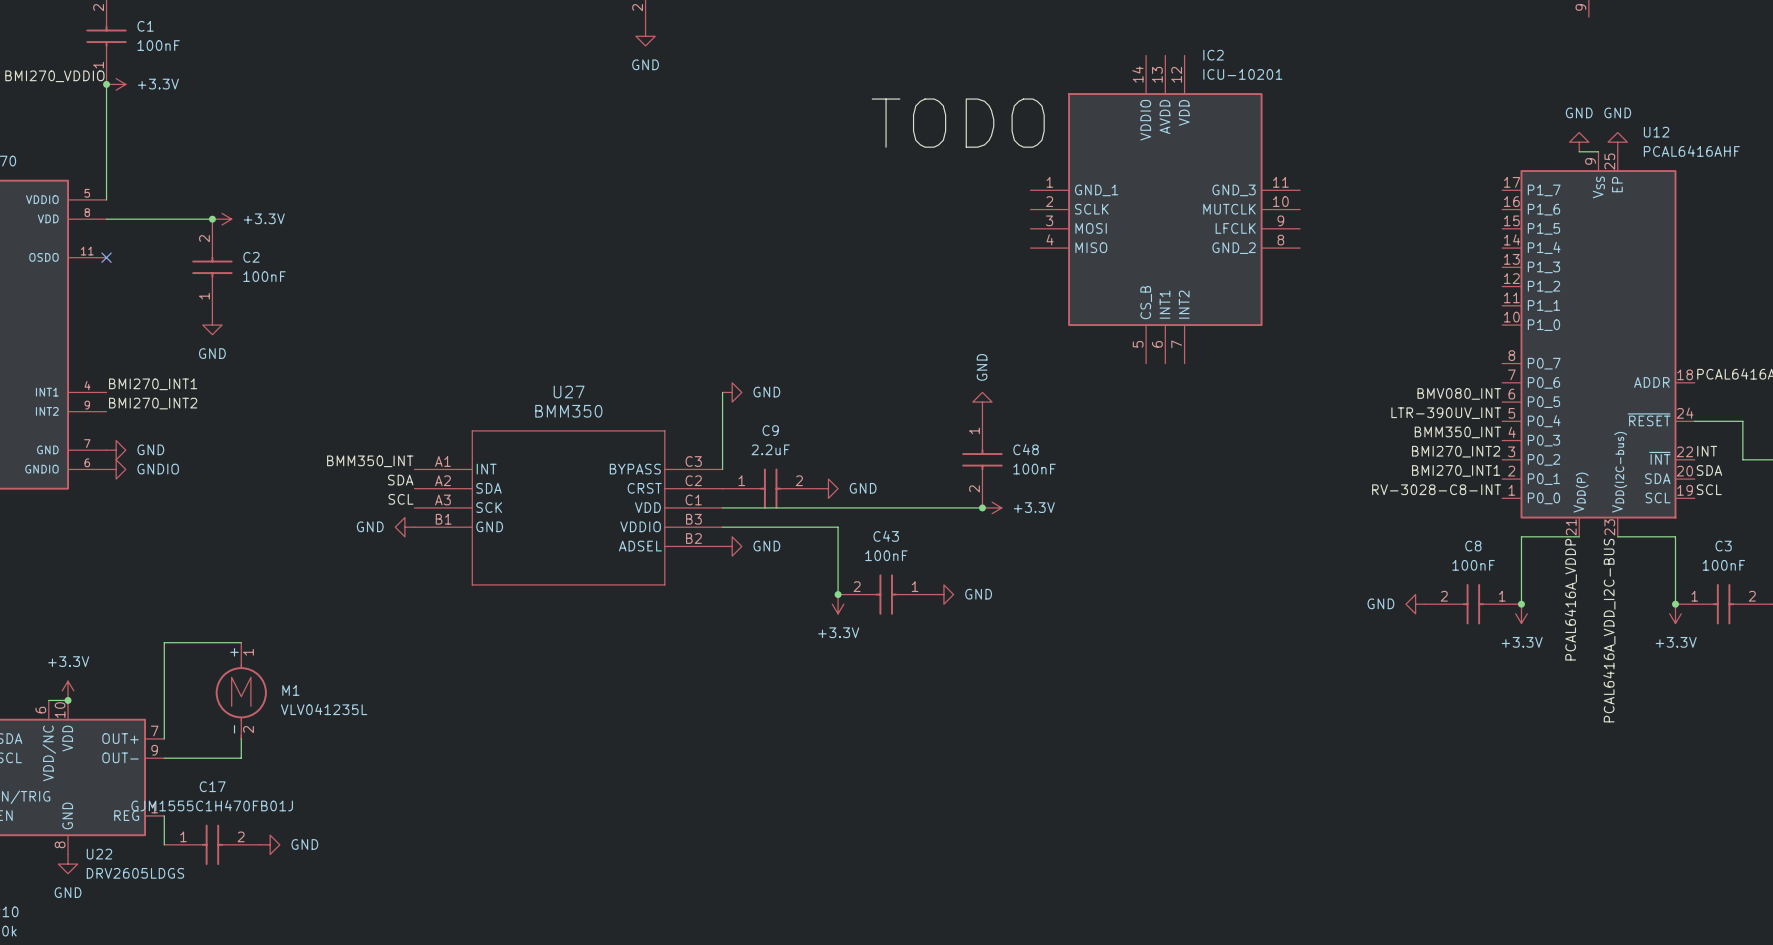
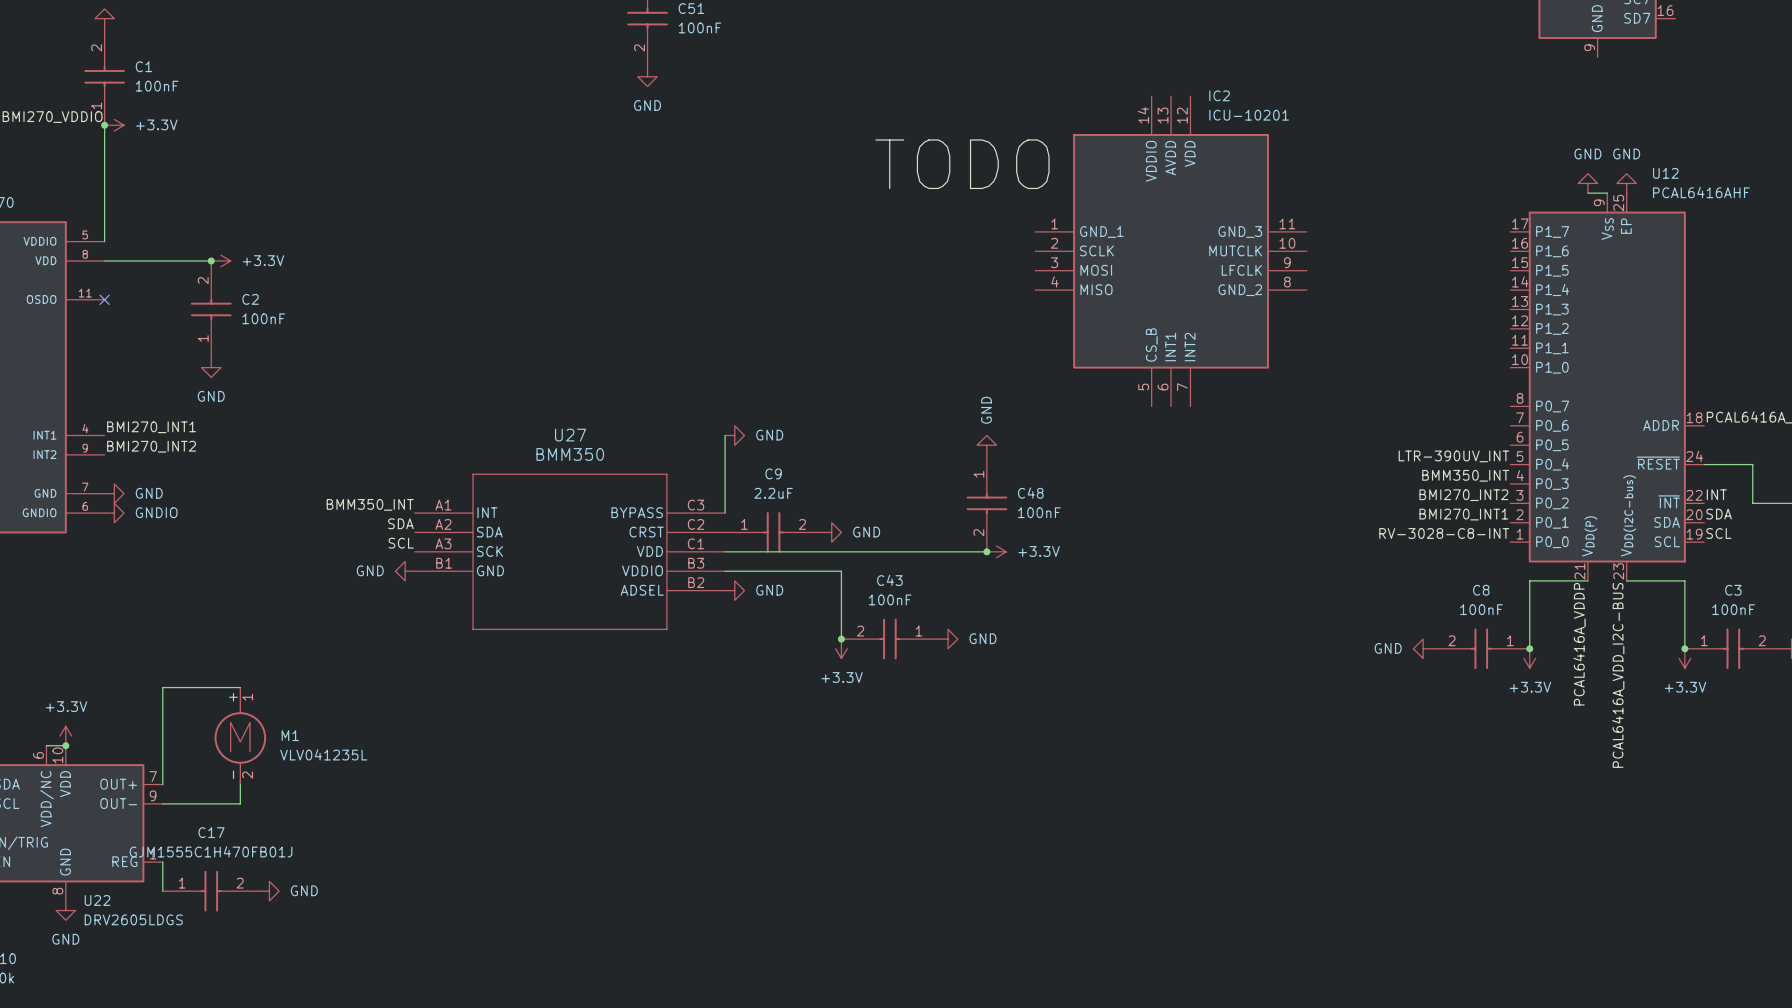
label: BMV080_INT (1459, 393) -> none

